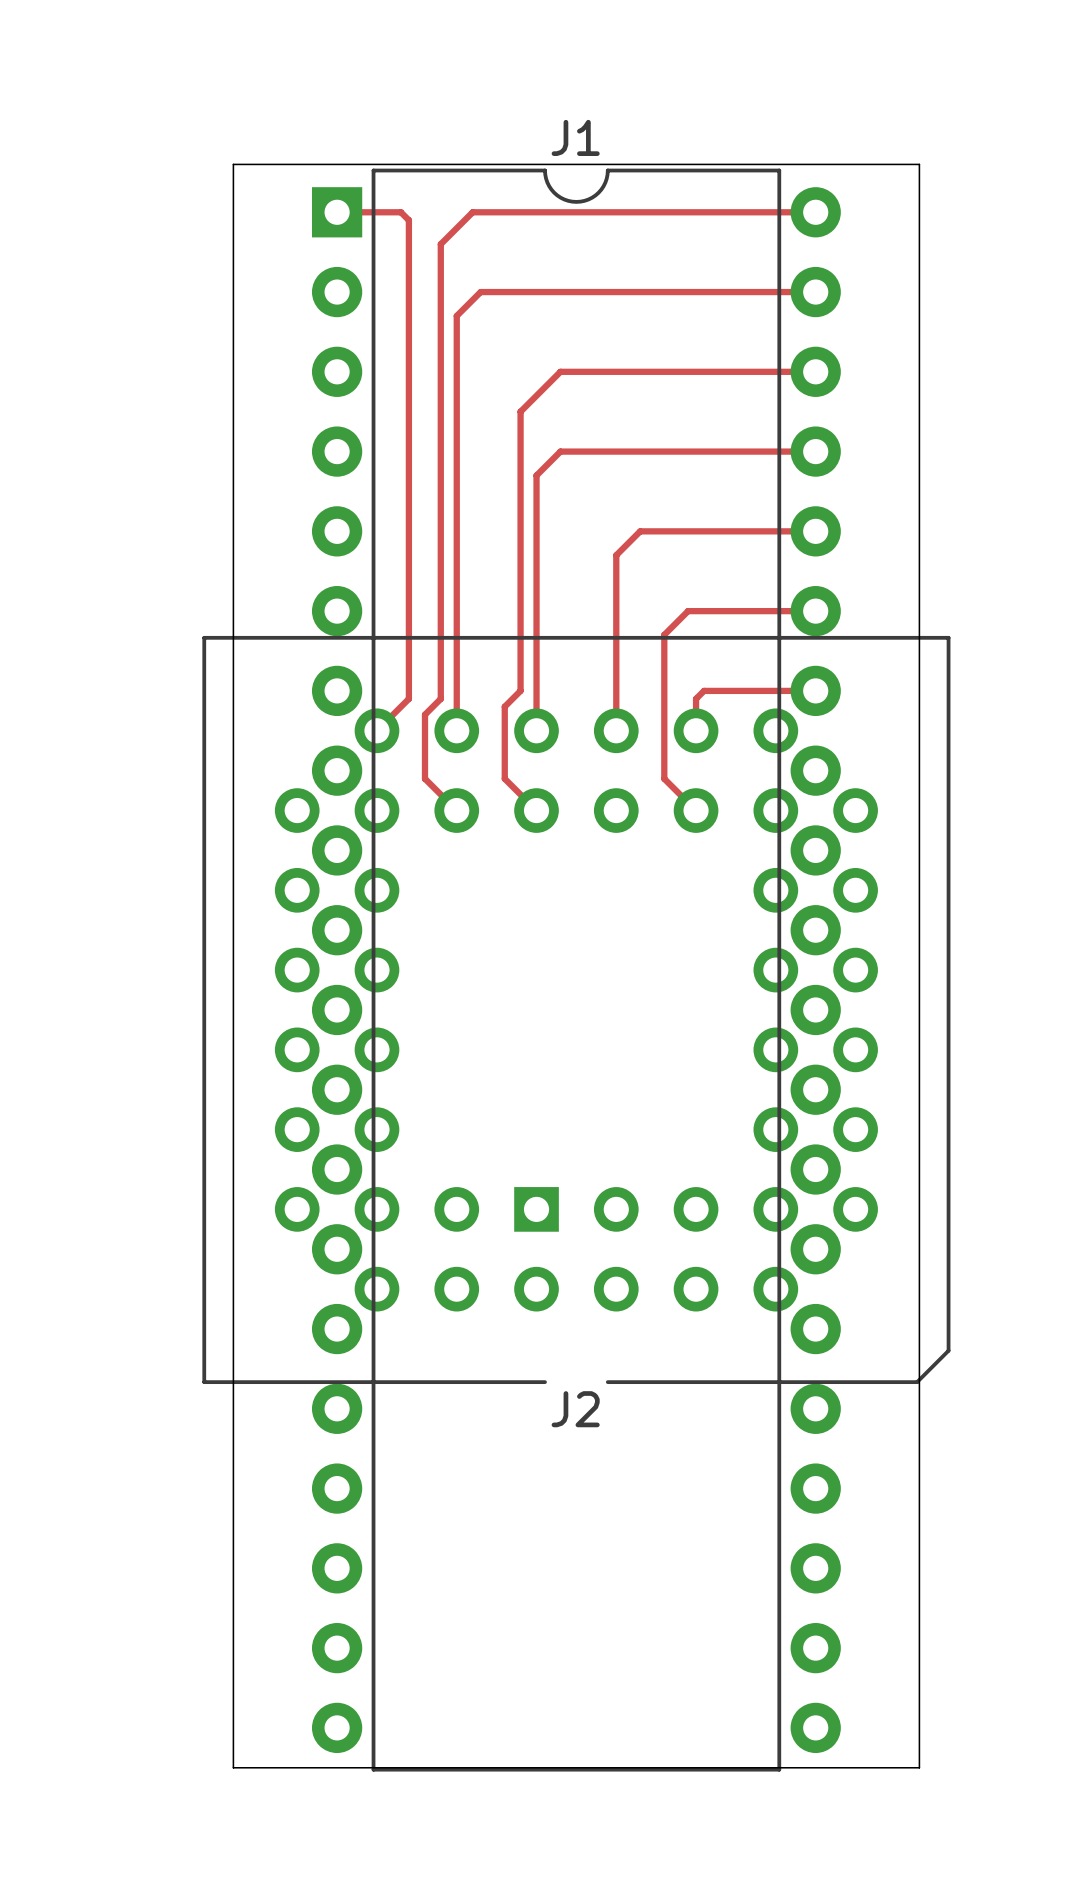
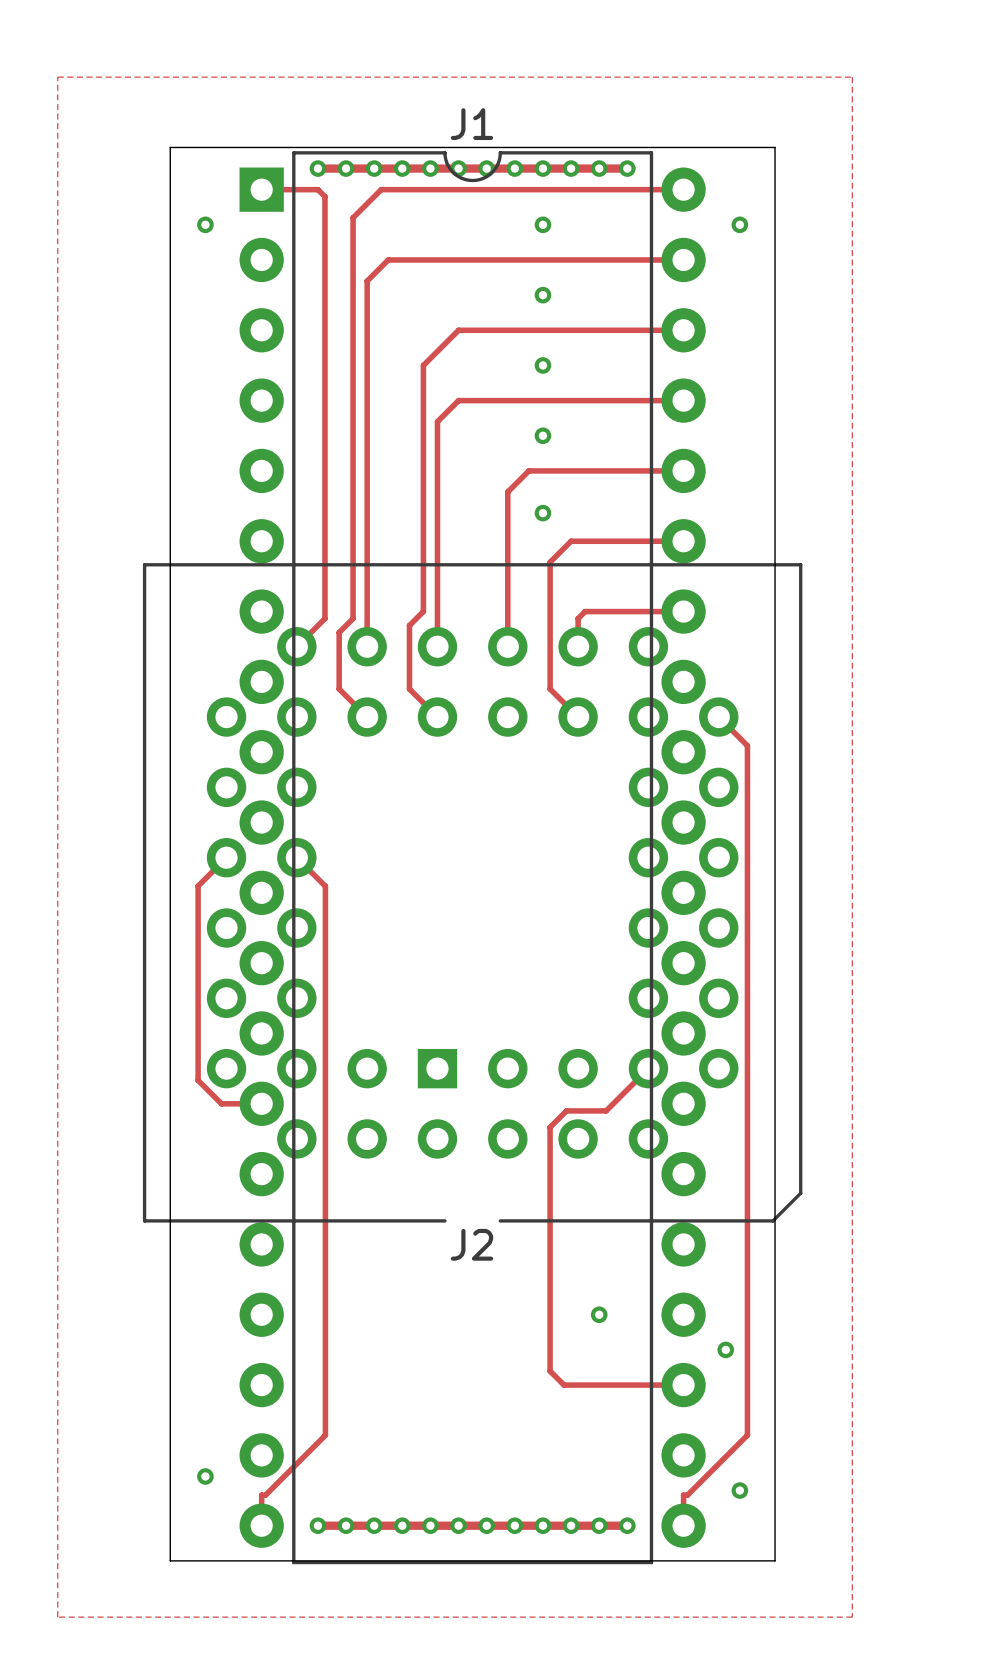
zone outline: none -> (57, 77) (852, 77) (852, 1617) (57, 1617) (57, 77)
track: none -> (317, 168) (627, 168)
via: none -> (317, 168)
via: none -> (346, 168)
via: none -> (374, 168)
via: none -> (402, 168)
via: none -> (430, 168)
via: none -> (458, 168)
via: none -> (486, 168)
via: none -> (514, 168)
via: none -> (542, 168)
via: none -> (571, 168)
via: none -> (599, 168)
via: none -> (627, 168)
via: none -> (205, 224)
via: none -> (542, 224)
via: none -> (739, 224)
via: none -> (542, 295)
via: none -> (542, 365)
via: none -> (542, 435)
via: none -> (542, 513)
track: none -> (718, 717) (747, 745) (747, 1435) (687, 1495) (683, 1495) (683, 1525)
track: none -> (226, 857) (198, 886) (198, 1080) (221, 1103) (261, 1103)
track: none -> (296, 857) (325, 886) (325, 1435) (265, 1495) (261, 1495) (261, 1525)
track: none -> (648, 1068) (606, 1110) (566, 1110) (550, 1127) (550, 1371) (564, 1385) (683, 1385)
via: none -> (599, 1314)
via: none -> (725, 1349)
via: none -> (205, 1476)
via: none -> (739, 1490)
track: none -> (317, 1525) (627, 1525)
via: none -> (317, 1525)
via: none -> (346, 1525)
via: none -> (374, 1525)
via: none -> (402, 1525)
via: none -> (430, 1525)
via: none -> (458, 1525)
via: none -> (486, 1525)
via: none -> (514, 1525)
via: none -> (542, 1525)
via: none -> (571, 1525)
via: none -> (599, 1525)
via: none -> (627, 1525)

